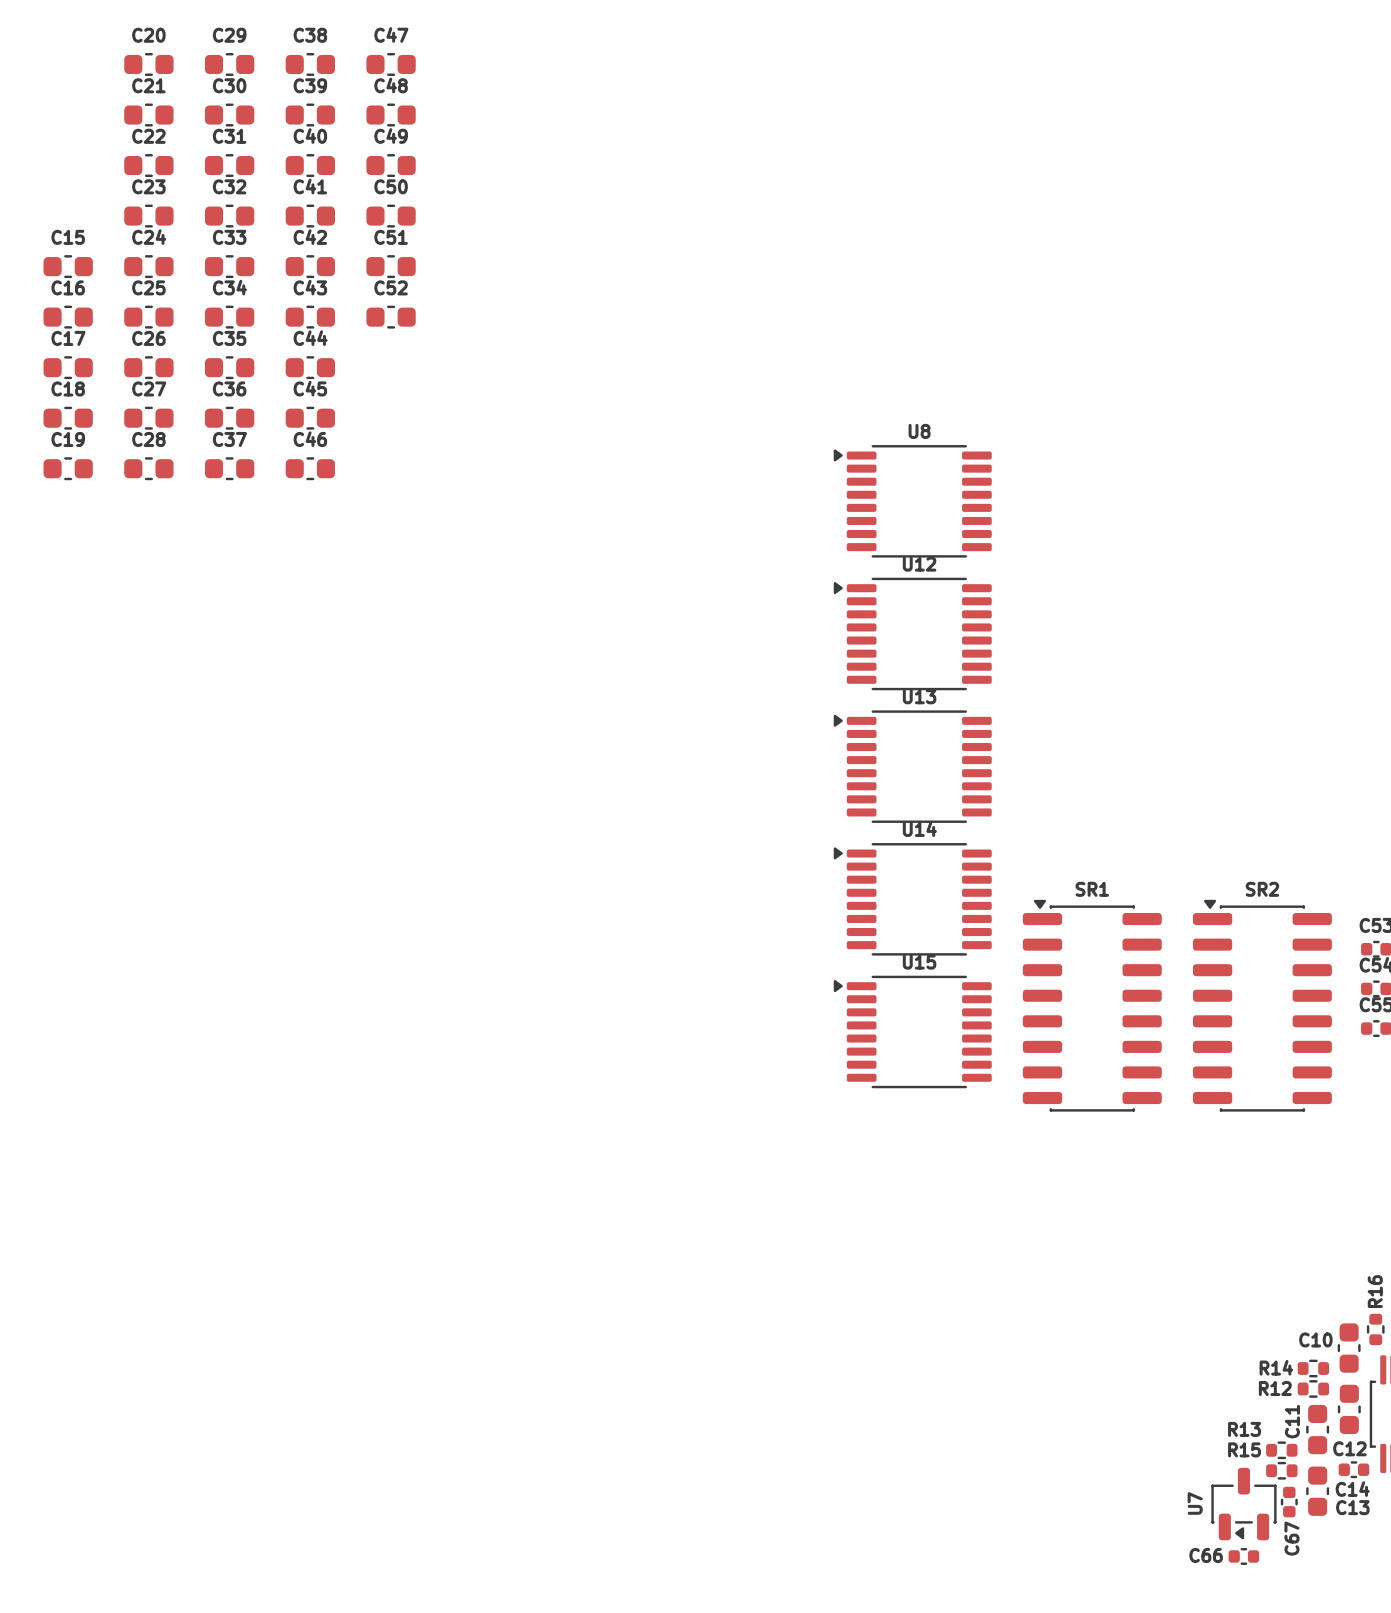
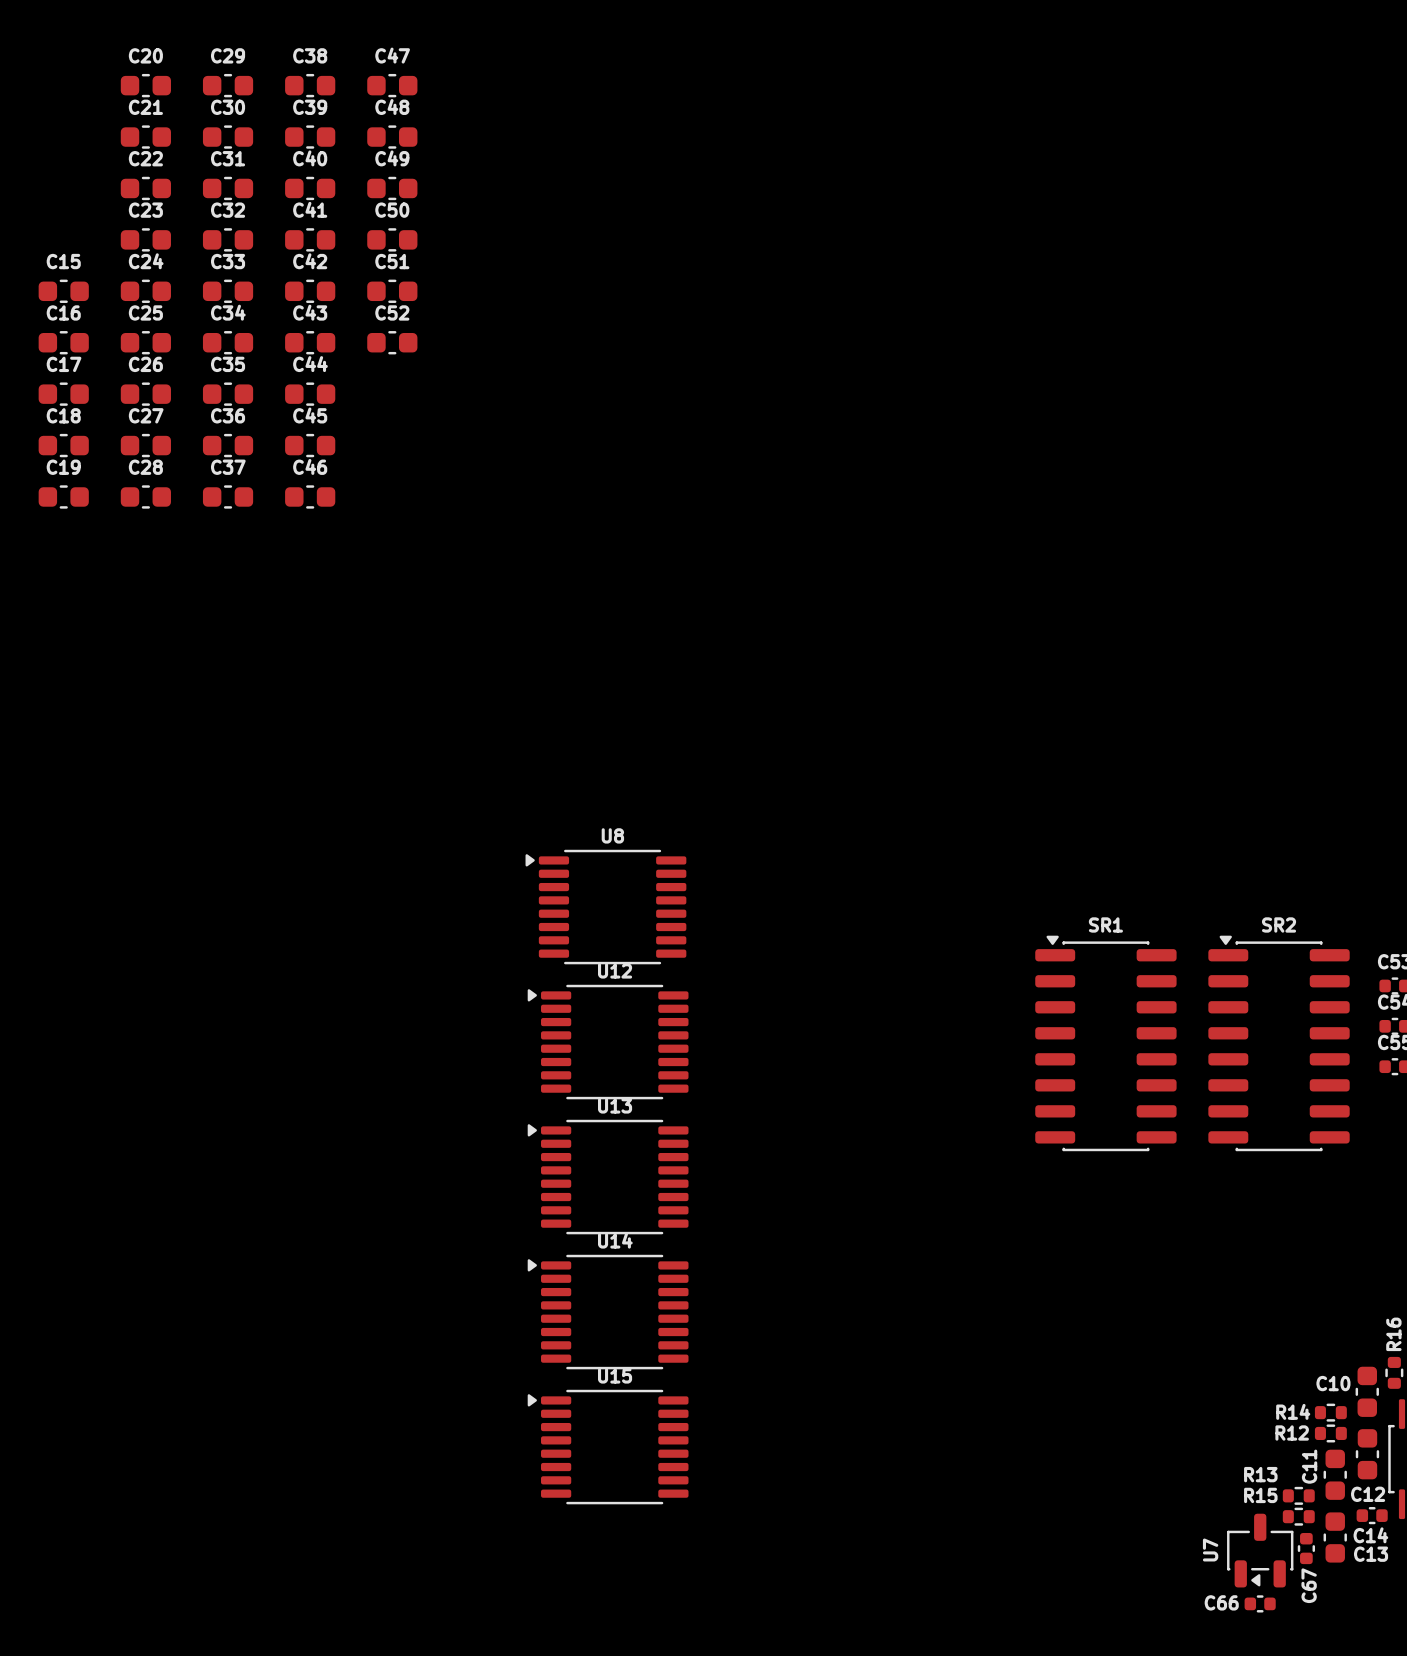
U8 position: (912, 501) -> (605, 907)
U12 position: (912, 633) -> (608, 1042)
U13 position: (912, 766) -> (608, 1177)
U14 position: (912, 899) -> (608, 1312)
U15 position: (912, 1031) -> (608, 1447)

